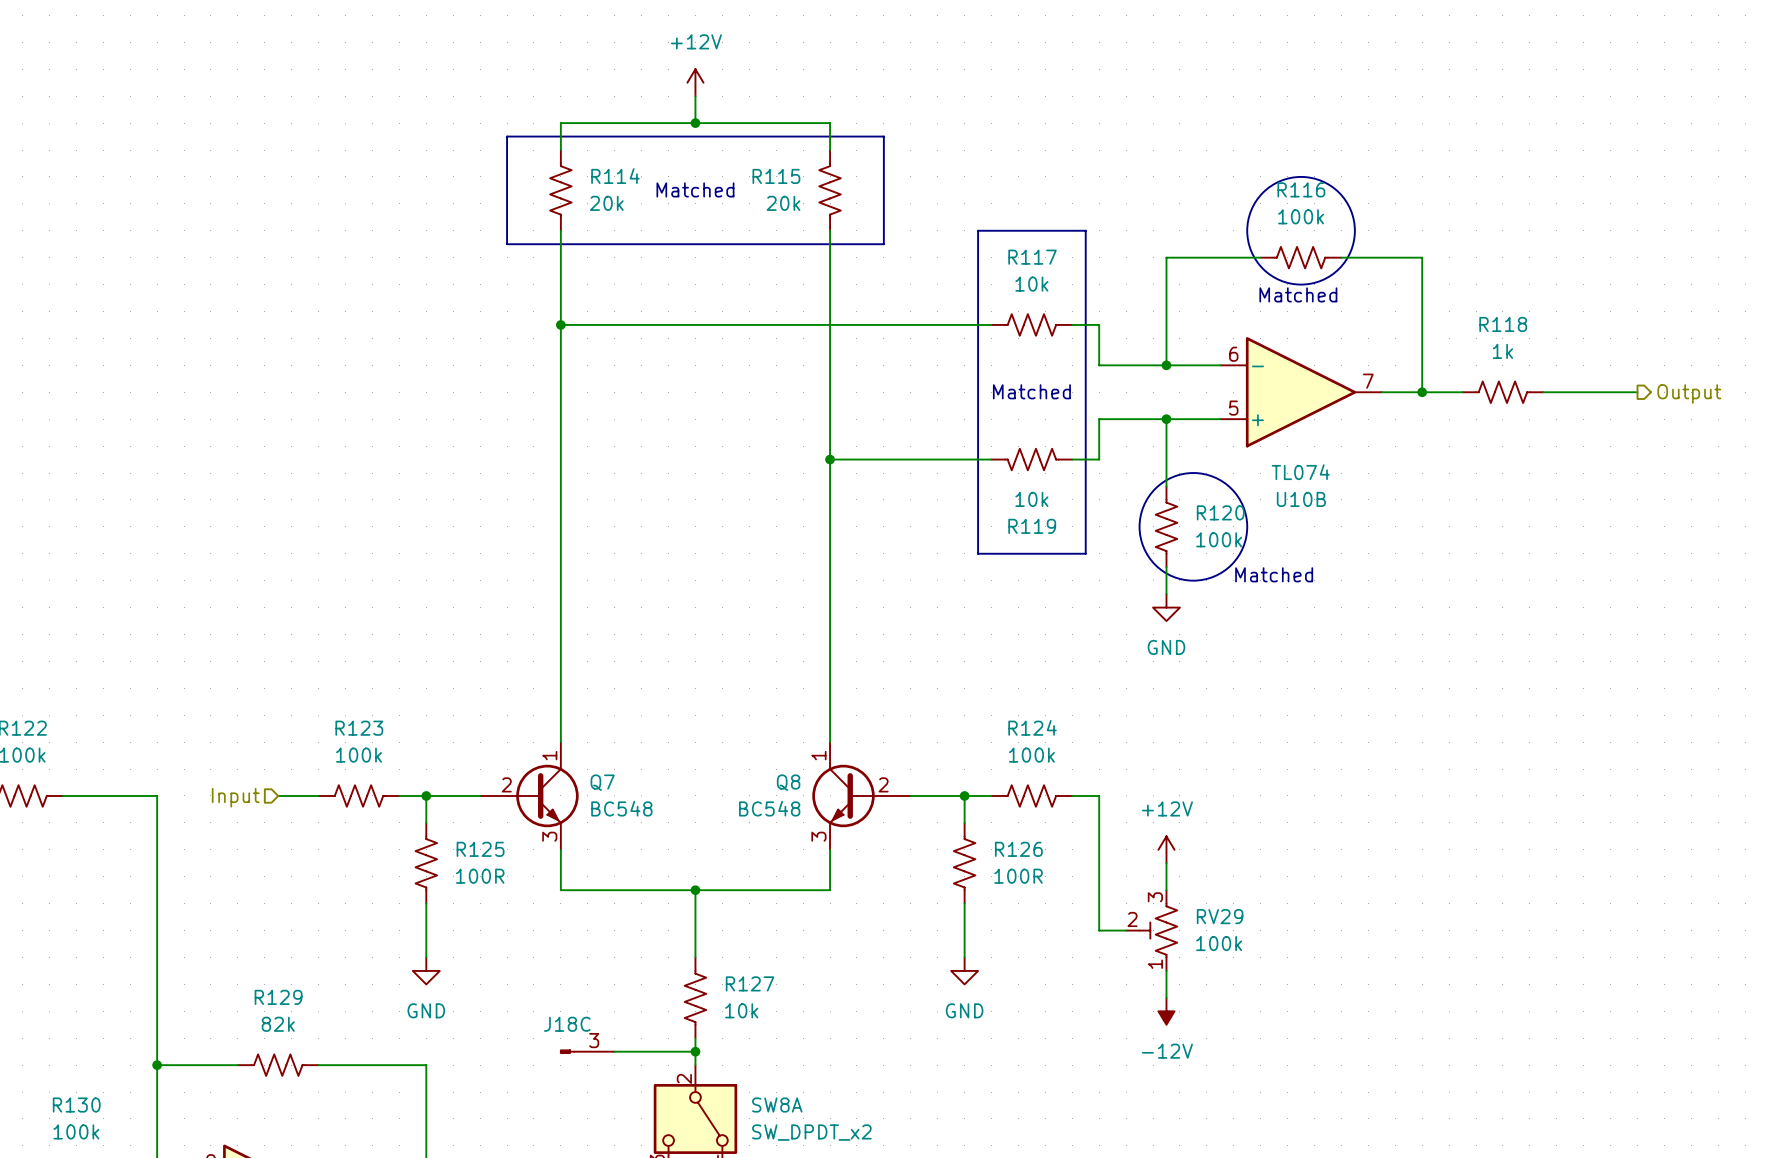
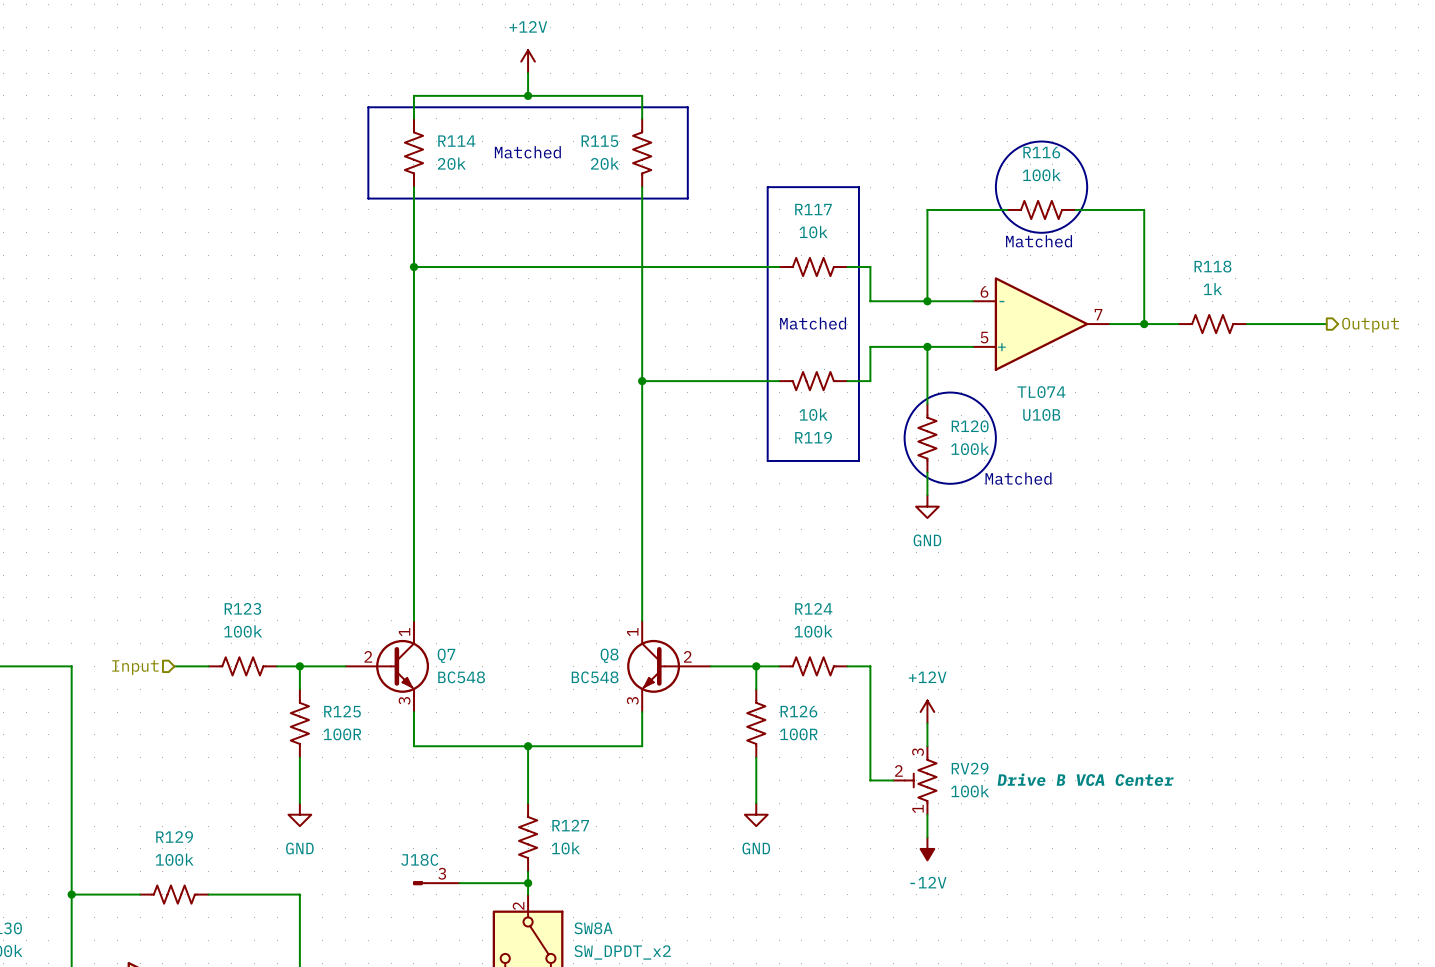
RV29 text: none -> Drive B VCA Center (1085, 779)
R129 value: 82k (278, 1024) -> 100k (174, 859)

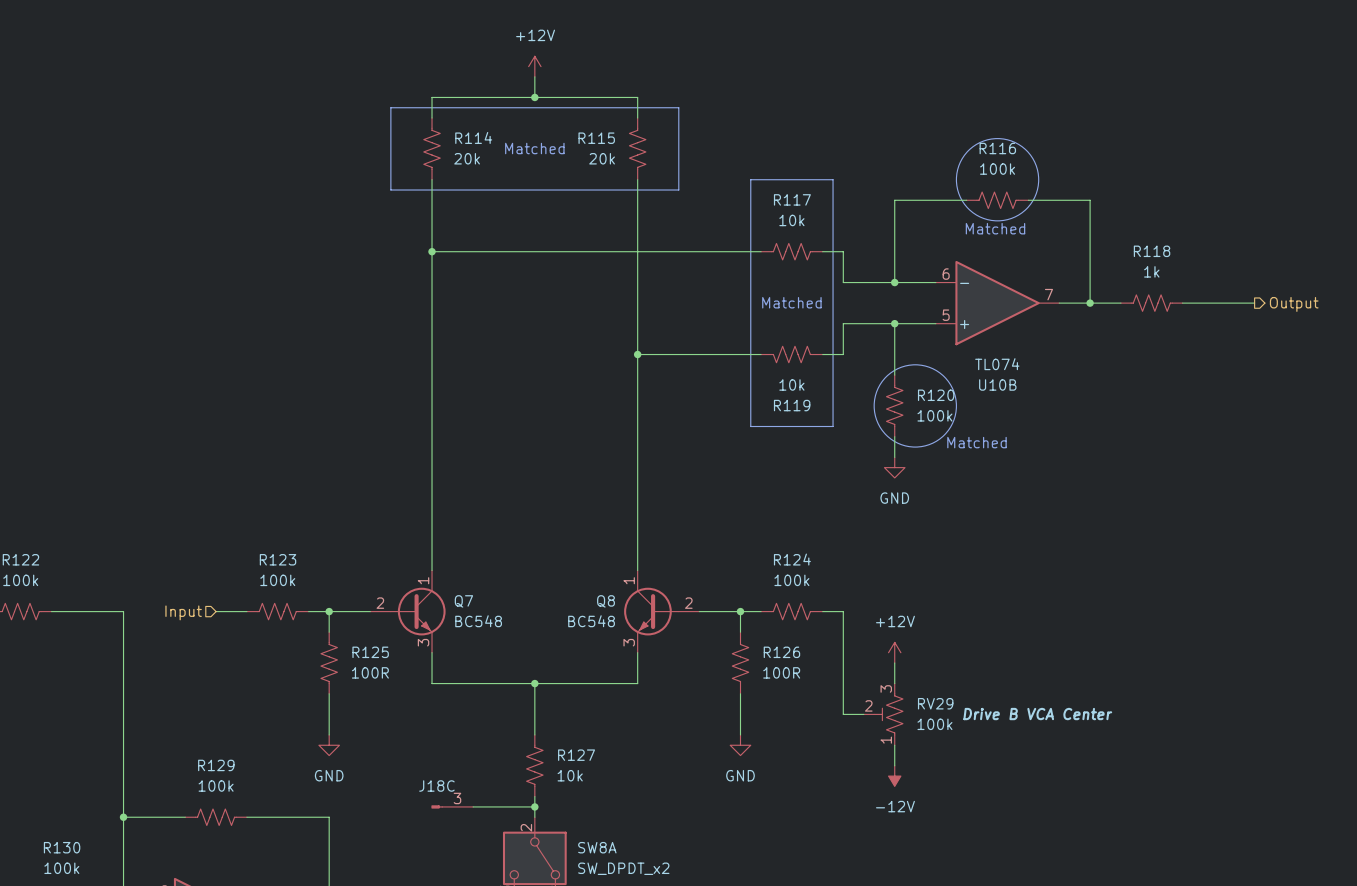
Q7 symbol: [345, 620, 430, 713] -> [370, 570, 446, 653]
Q8 symbol: [627, 620, 711, 713] -> [624, 570, 700, 653]

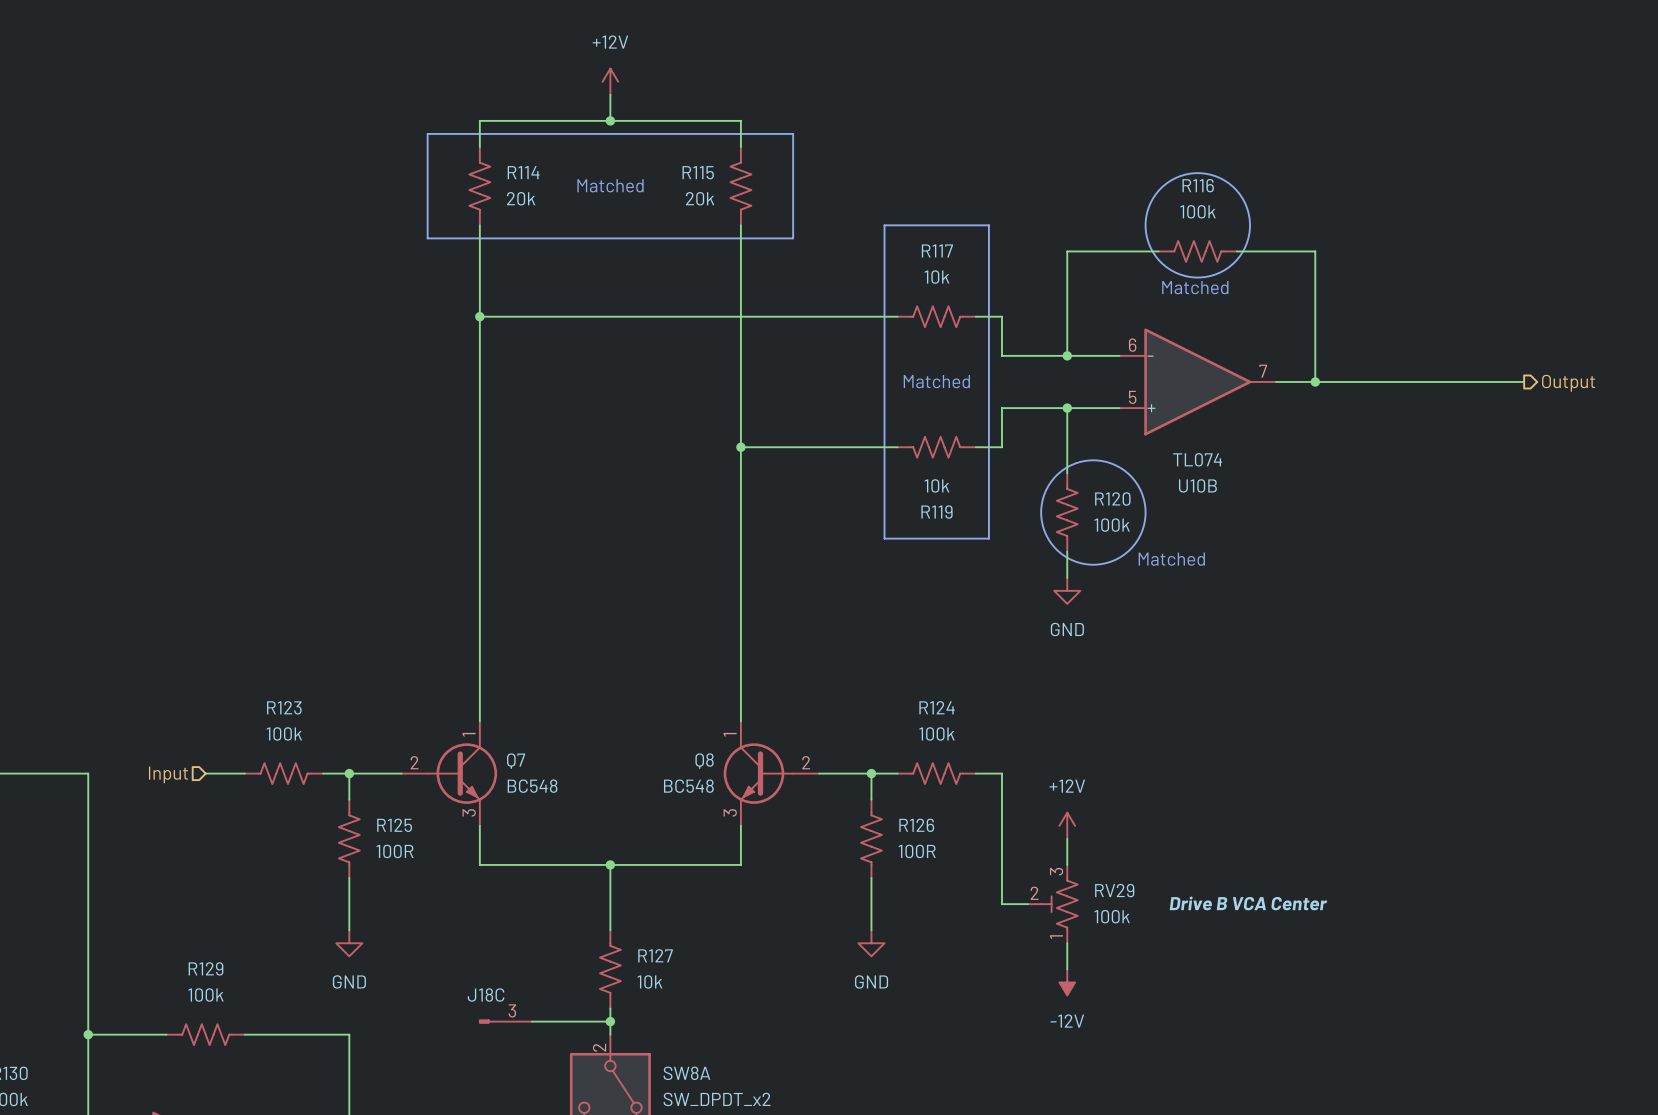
R118: 1k (1151, 303) -> none

